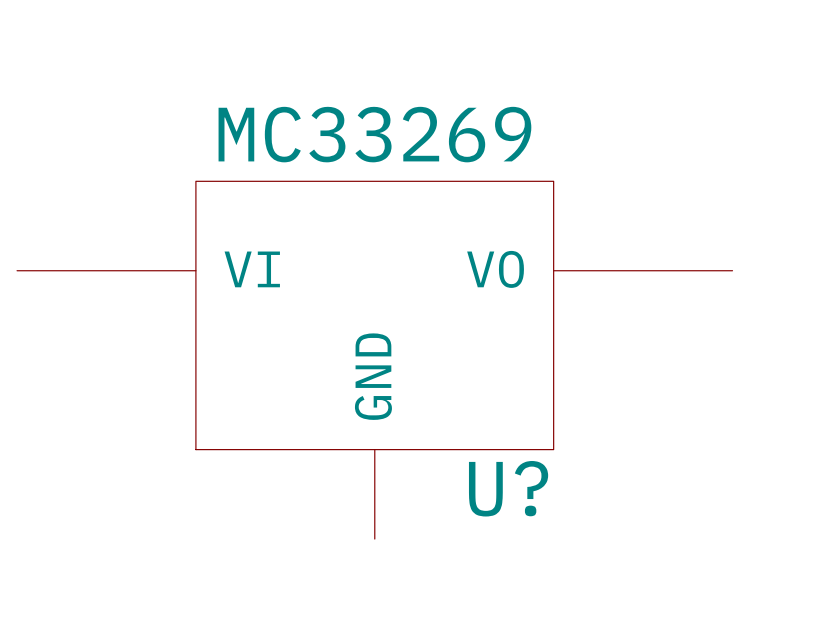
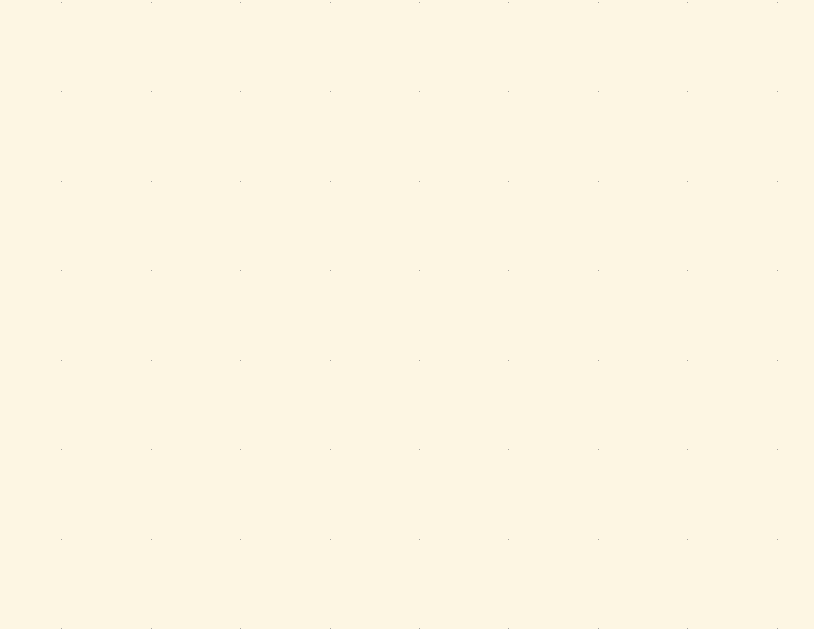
U?: MC33269 (374, 360) -> none

